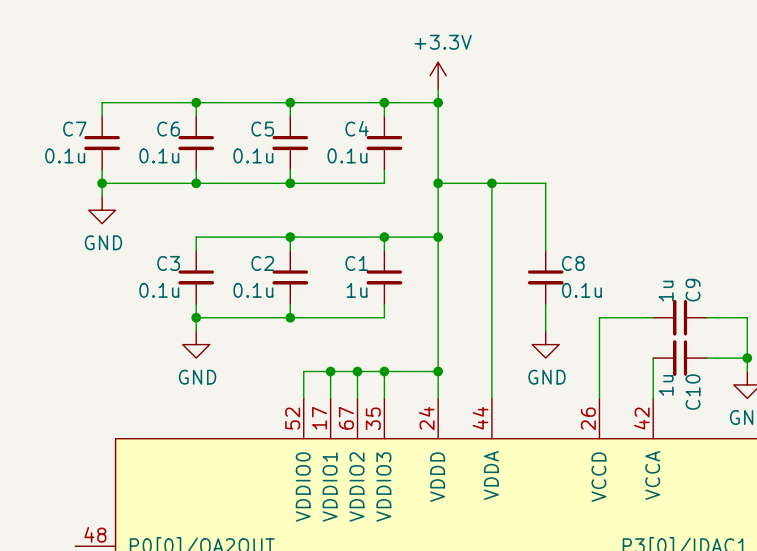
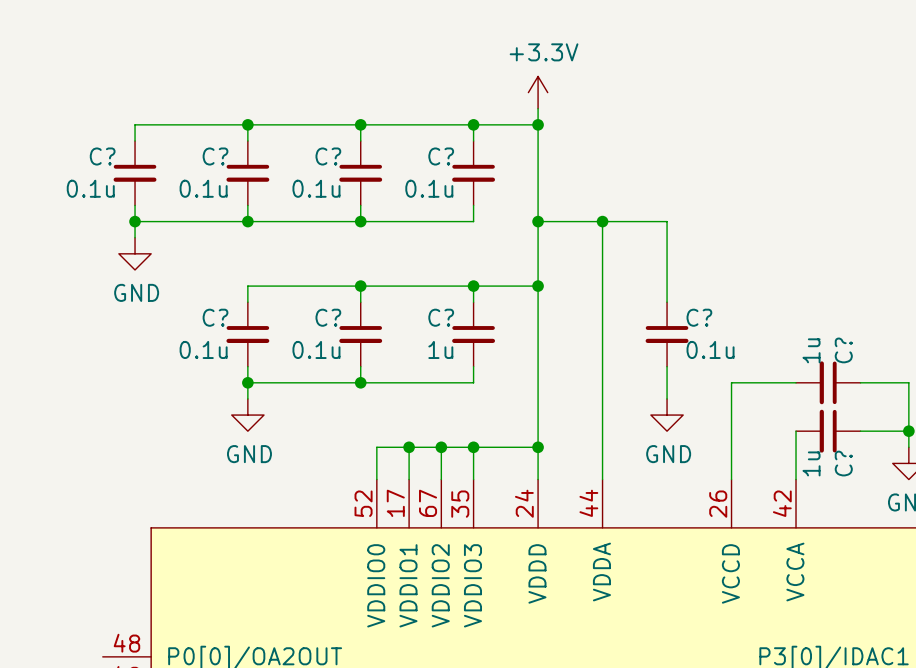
C4 name: C4 (357, 128) -> C? (441, 156)
C7 name: C7 (74, 129) -> C? (102, 156)
C6 name: C6 (168, 129) -> C? (215, 156)
C5 name: C5 (262, 129) -> C? (328, 156)
C3 name: C3 (168, 263) -> C? (215, 317)
C2 name: C2 (262, 263) -> C? (328, 317)
C1 name: C1 (356, 263) -> C? (441, 317)
C8 name: C8 (573, 263) -> C? (699, 317)
C9 name: C9 (693, 290) -> C? (843, 350)
C10 name: C10 (693, 392) -> C? (843, 463)

